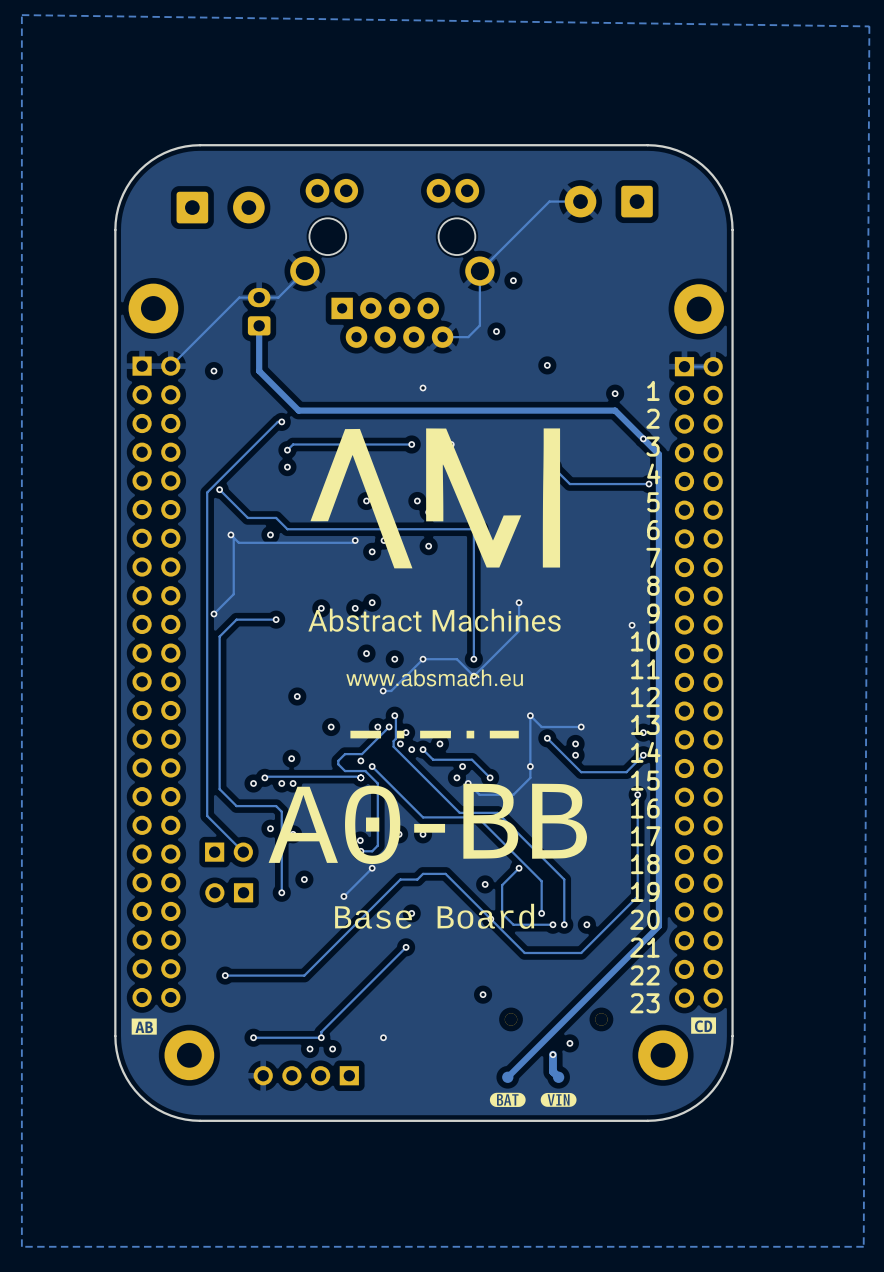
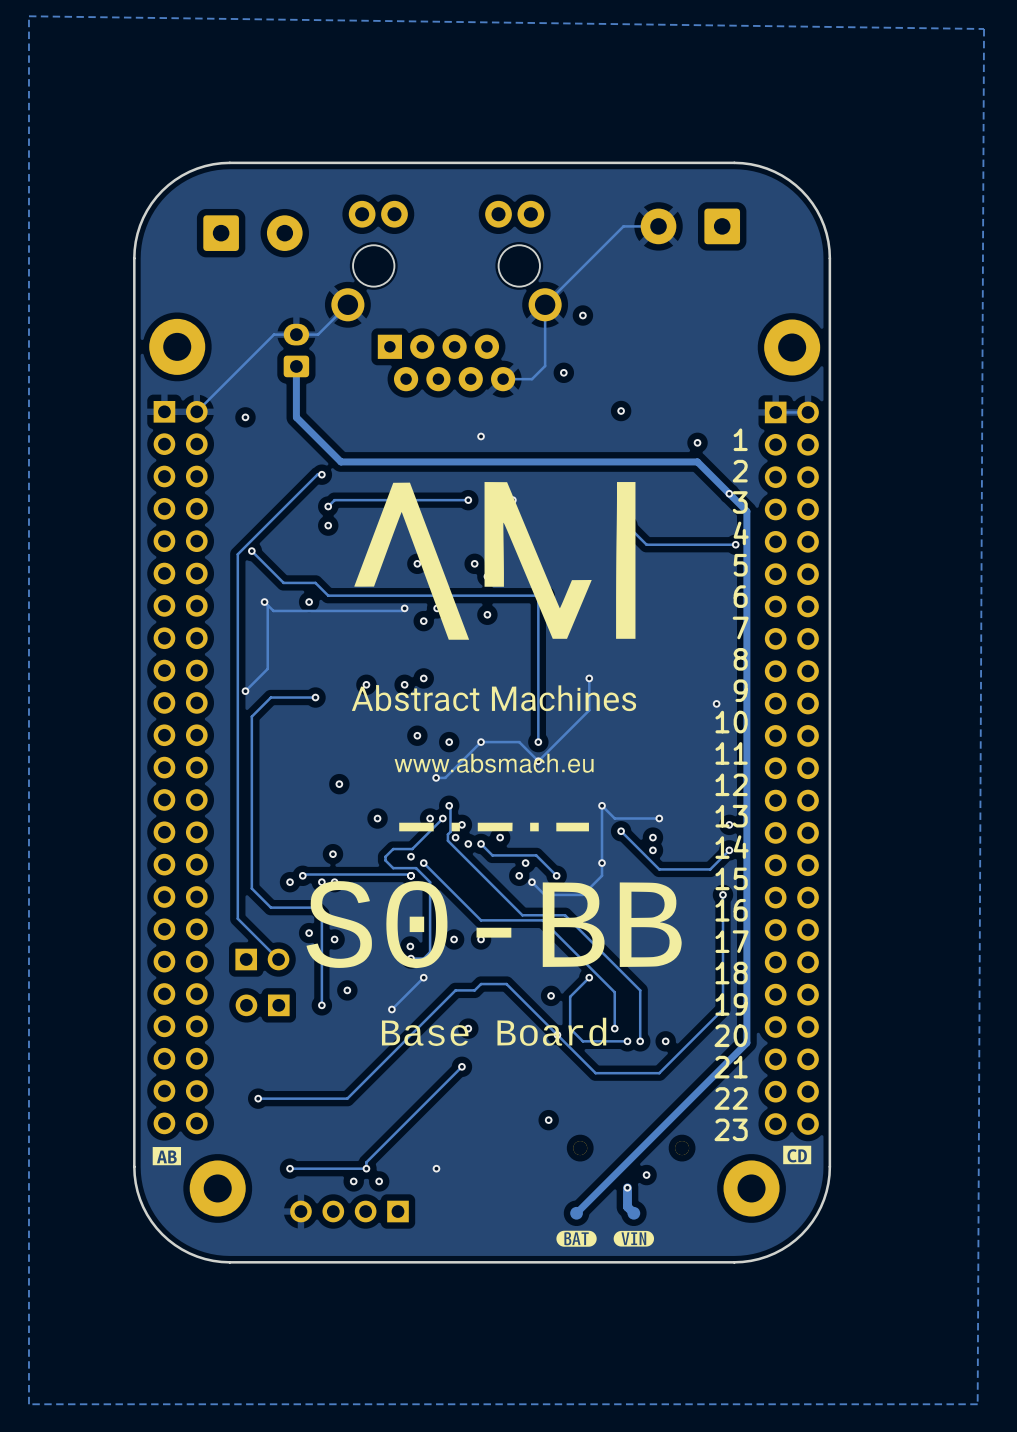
drawing shape: [268, 428, 588, 929] -> [306, 482, 682, 1047]

